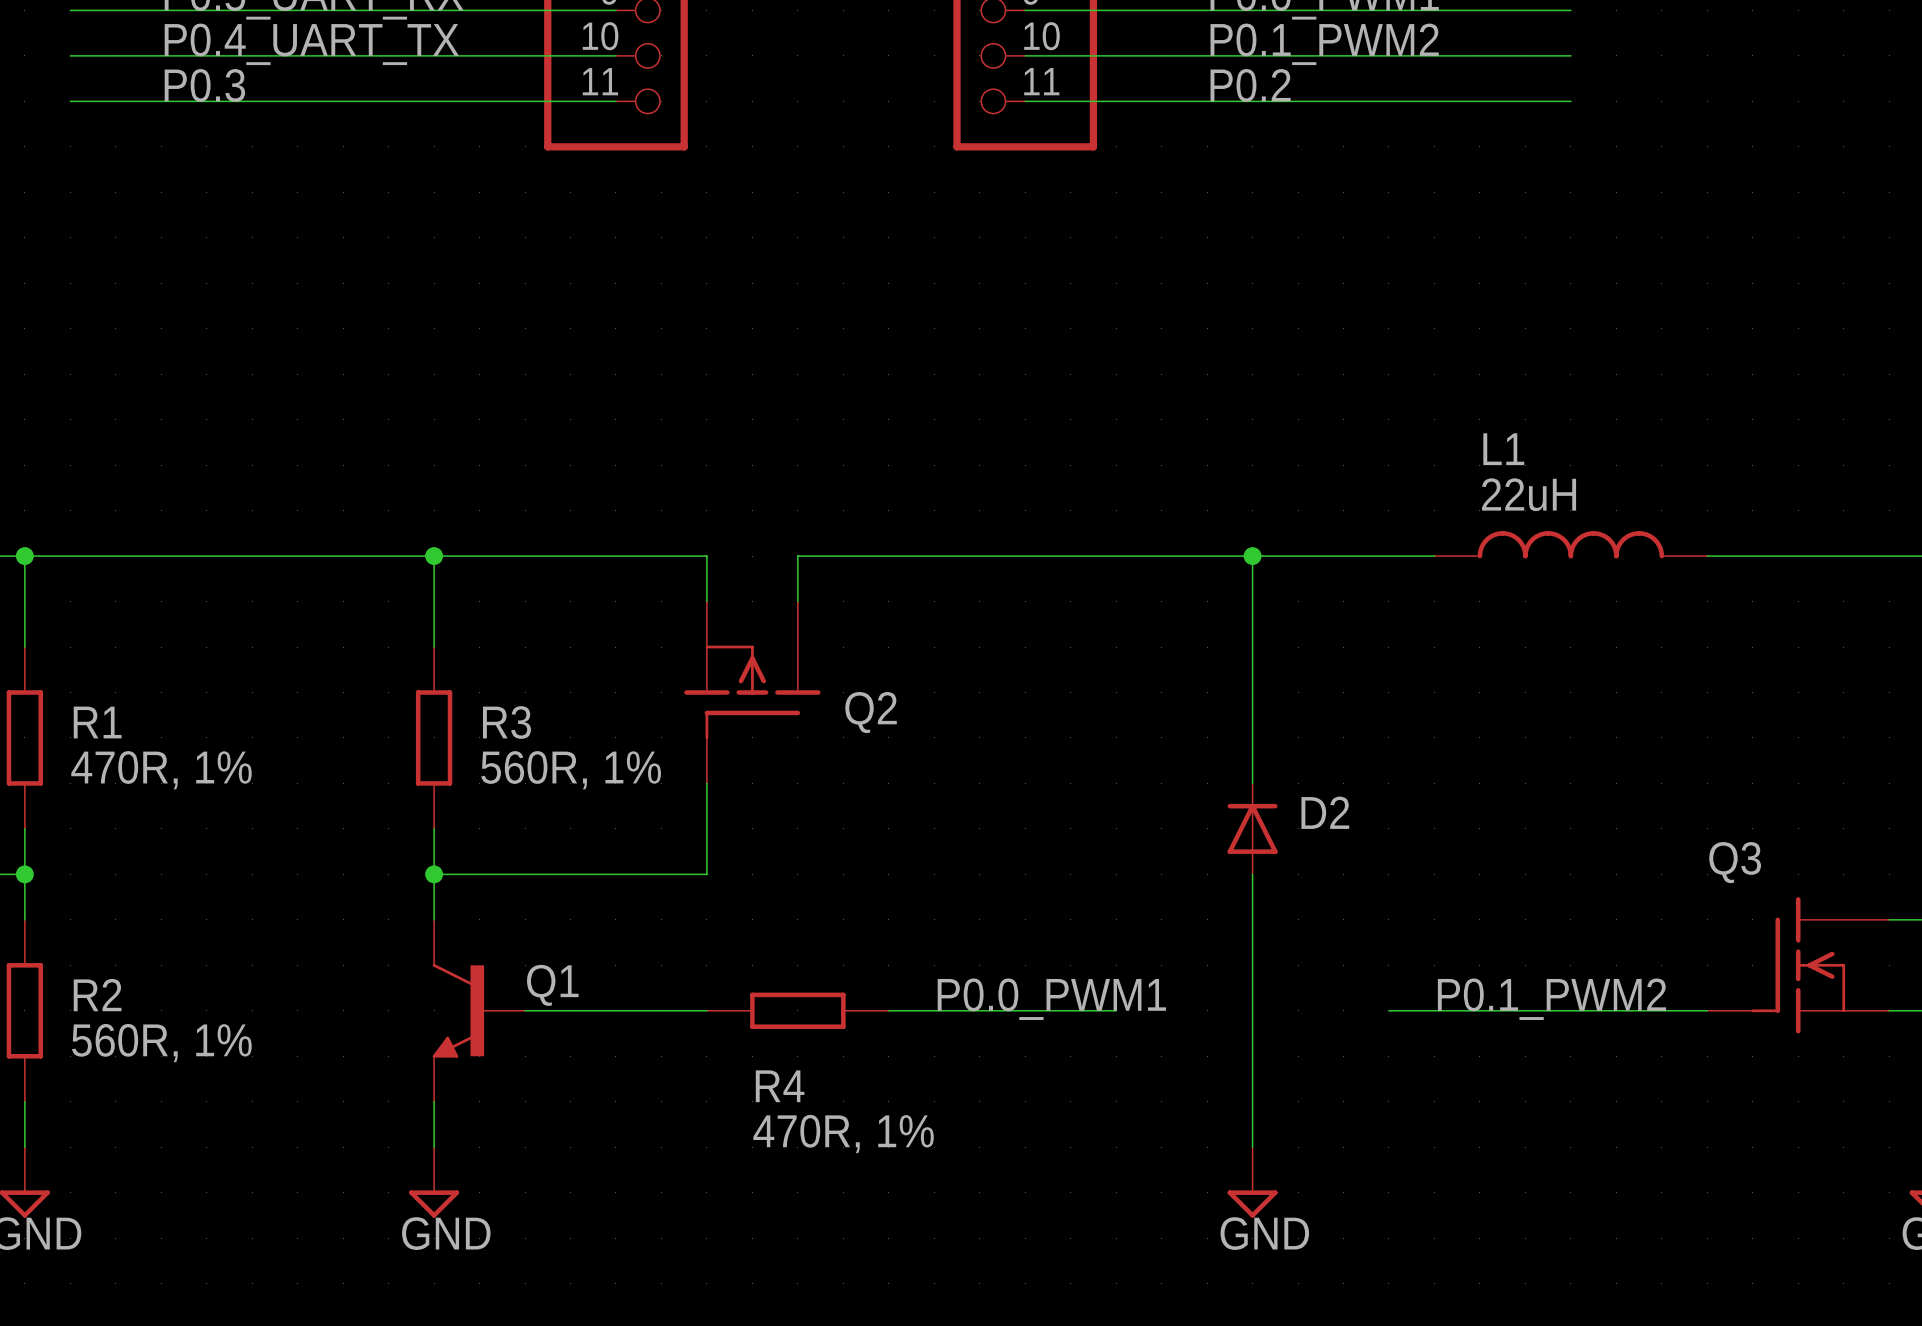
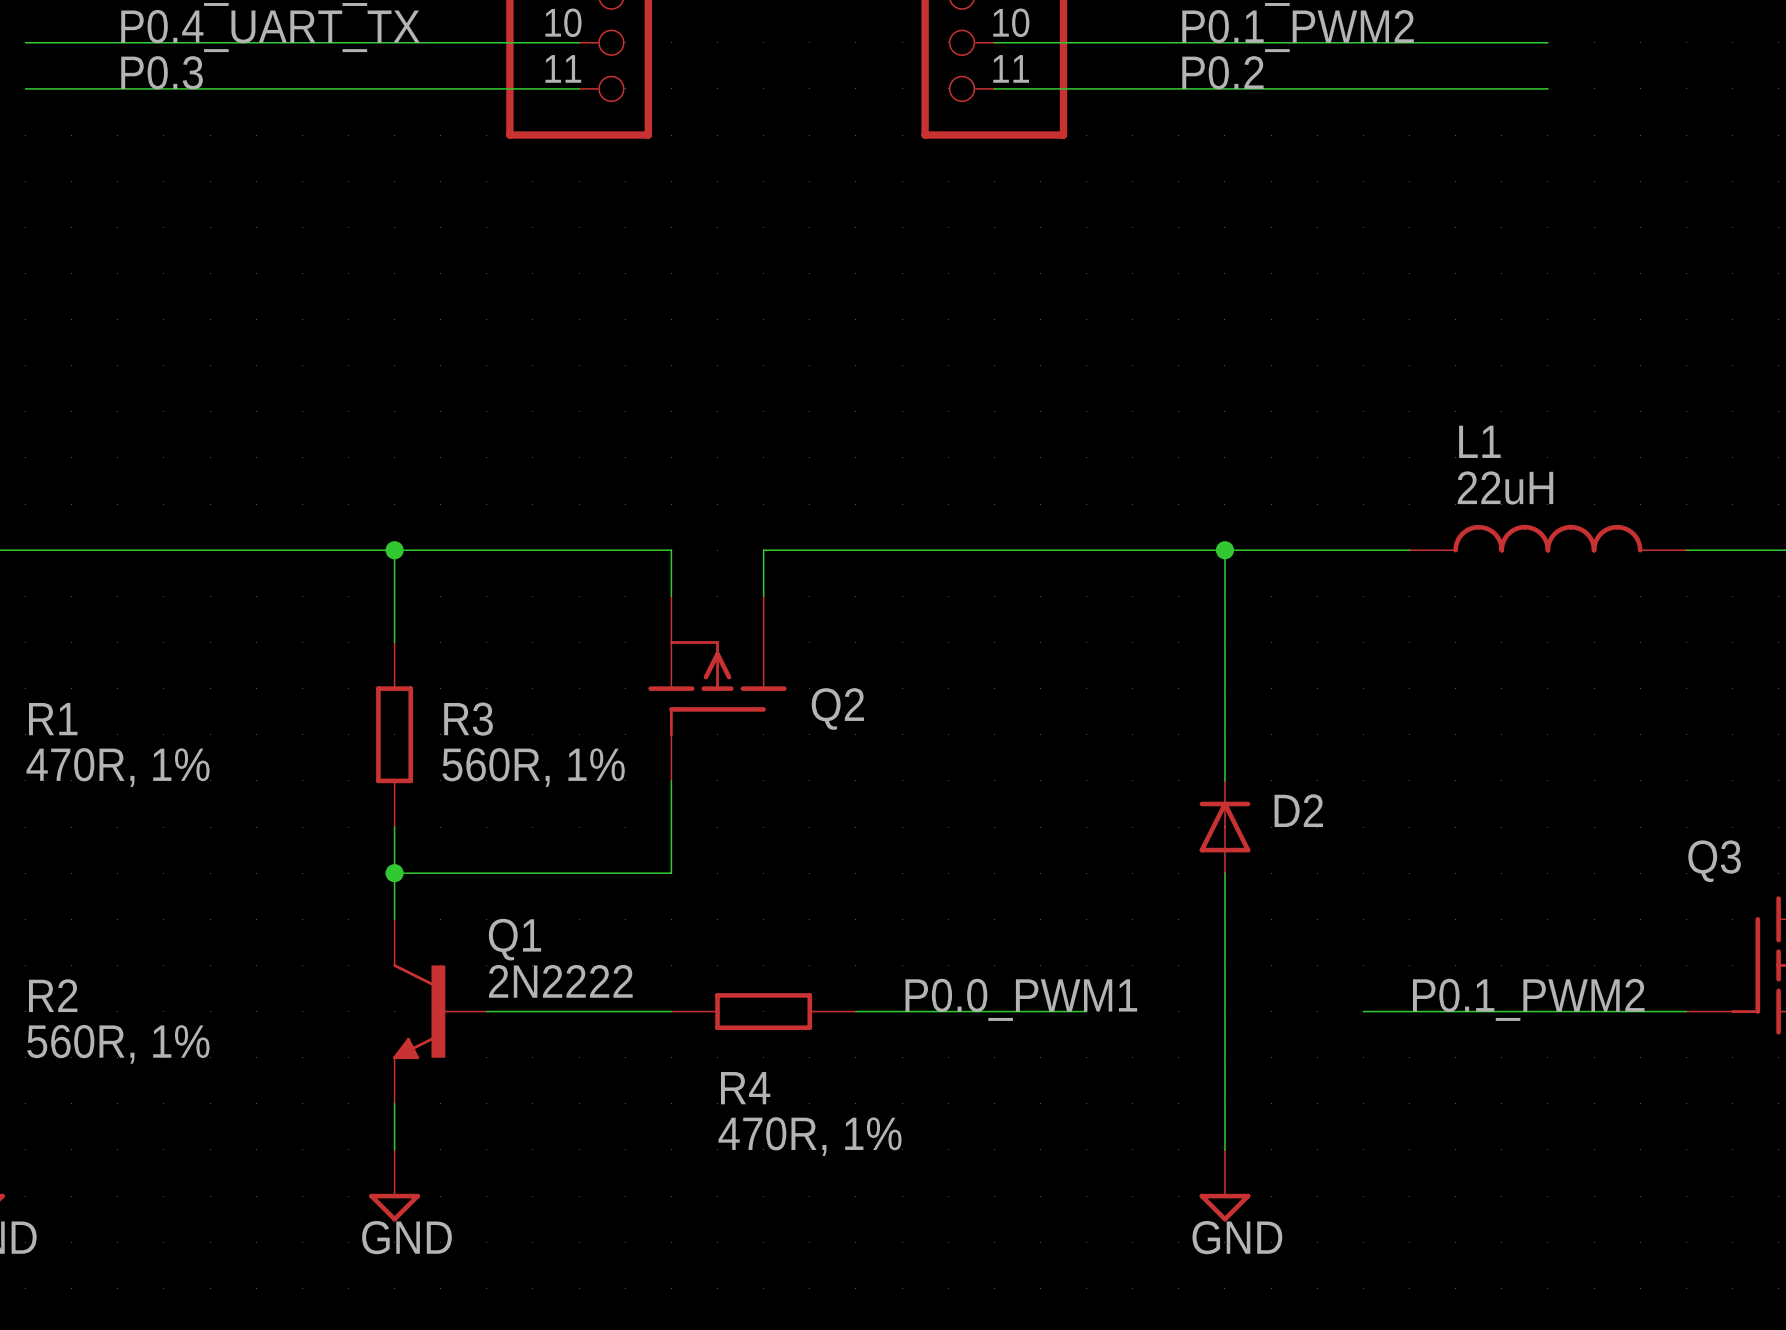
Q1 value: none -> 2N2222 (560, 981)
Q1 name position: Q1 (552, 985) -> Q1 (514, 939)

